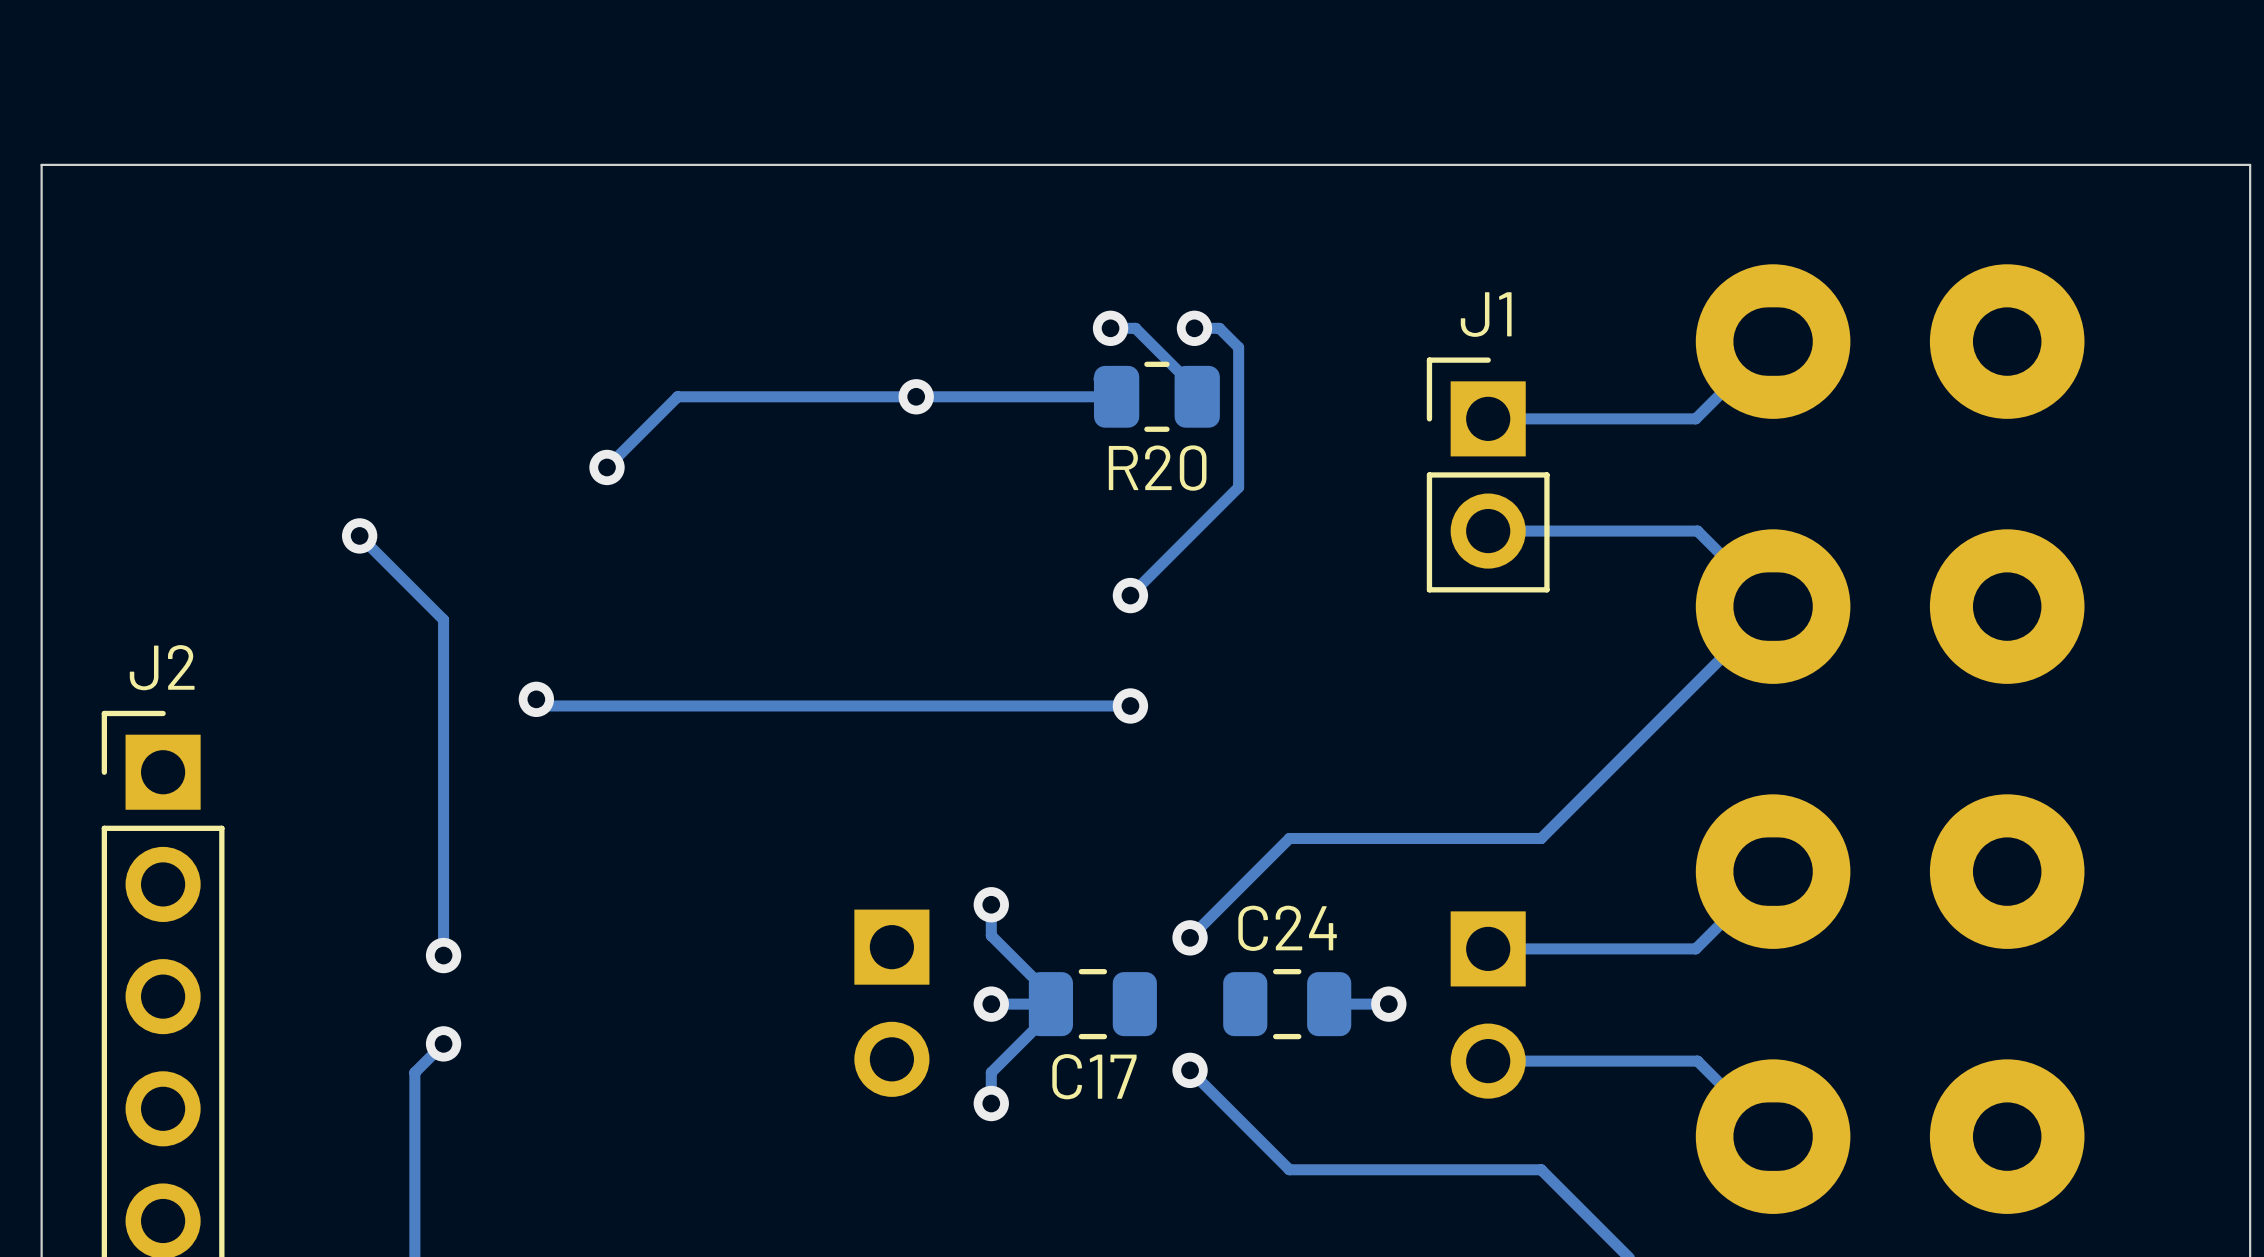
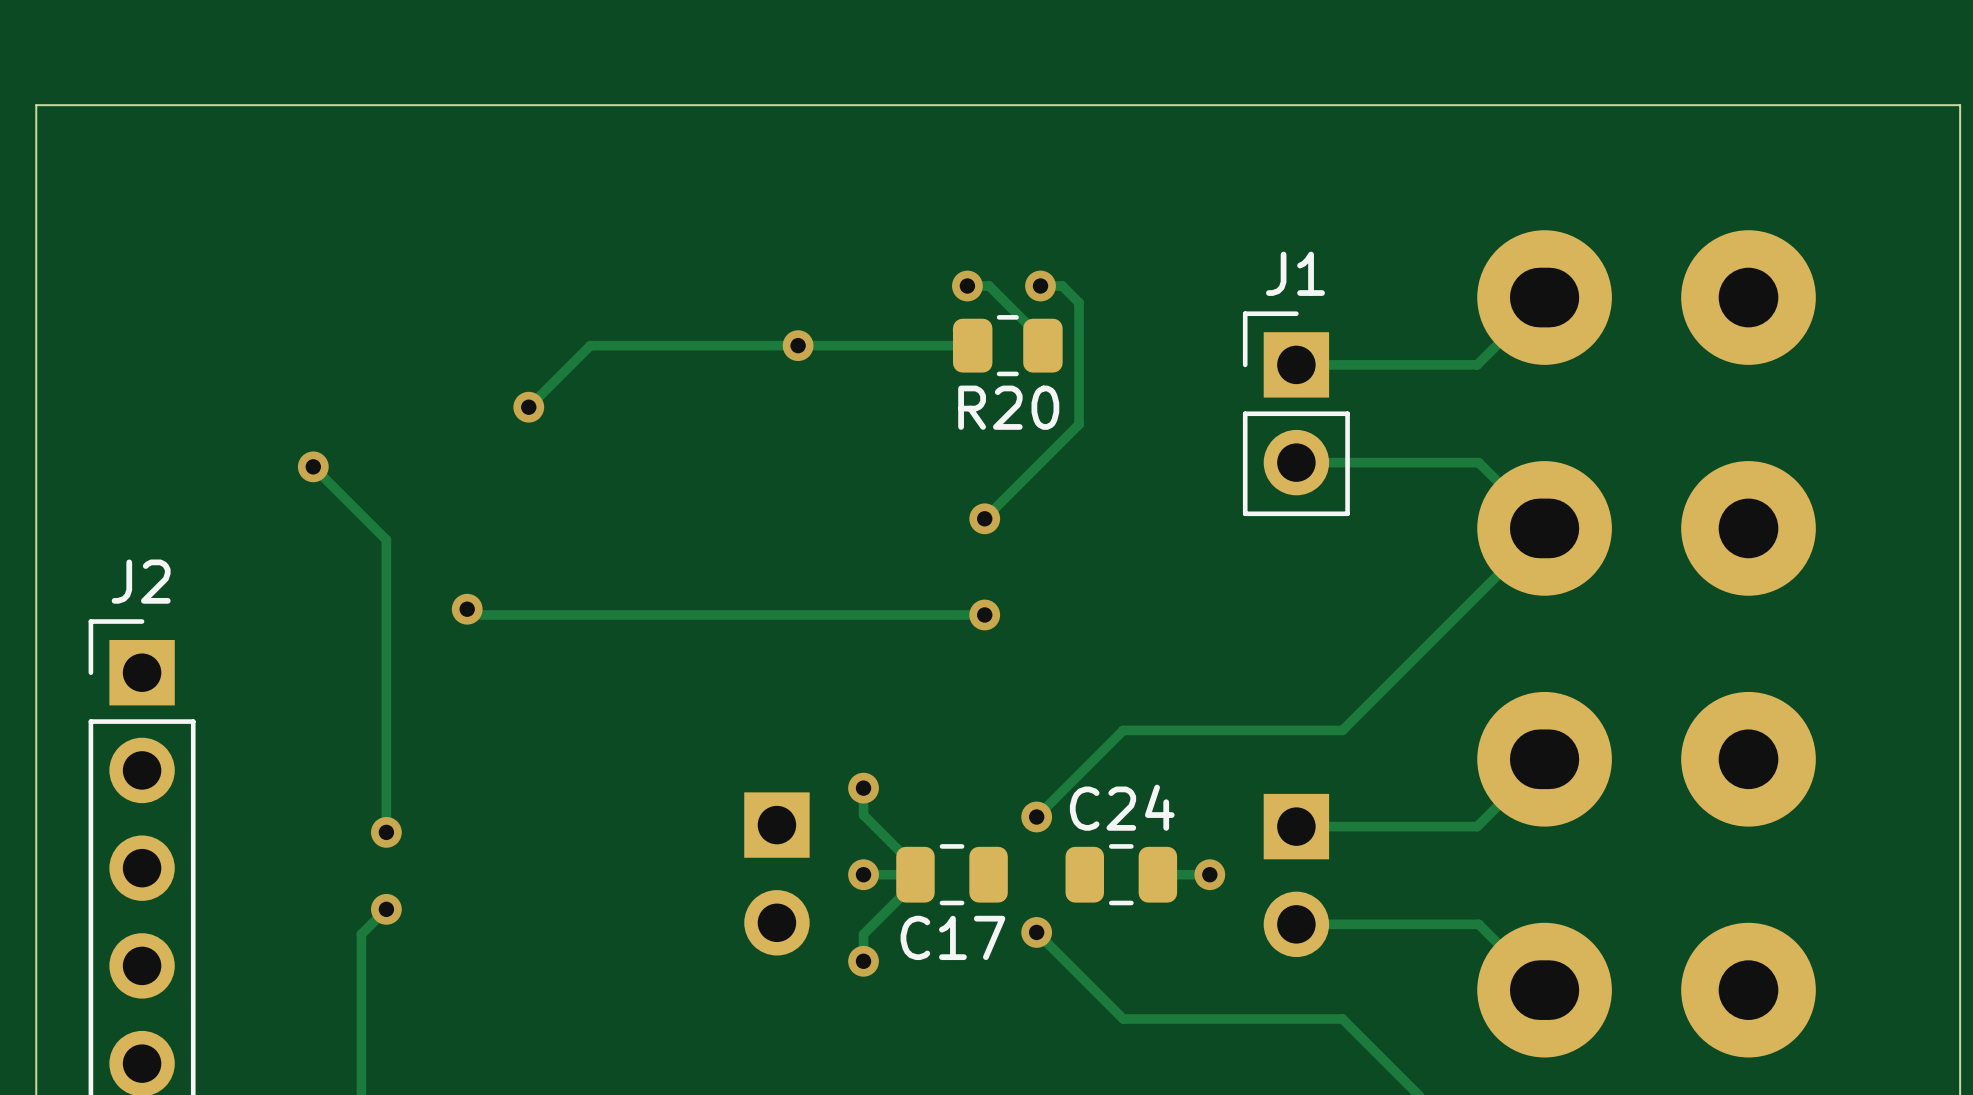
board edge: (2250, 164) (41, 164) -> (1960, 143) (1960, 105) (36, 105) (36, 143)

